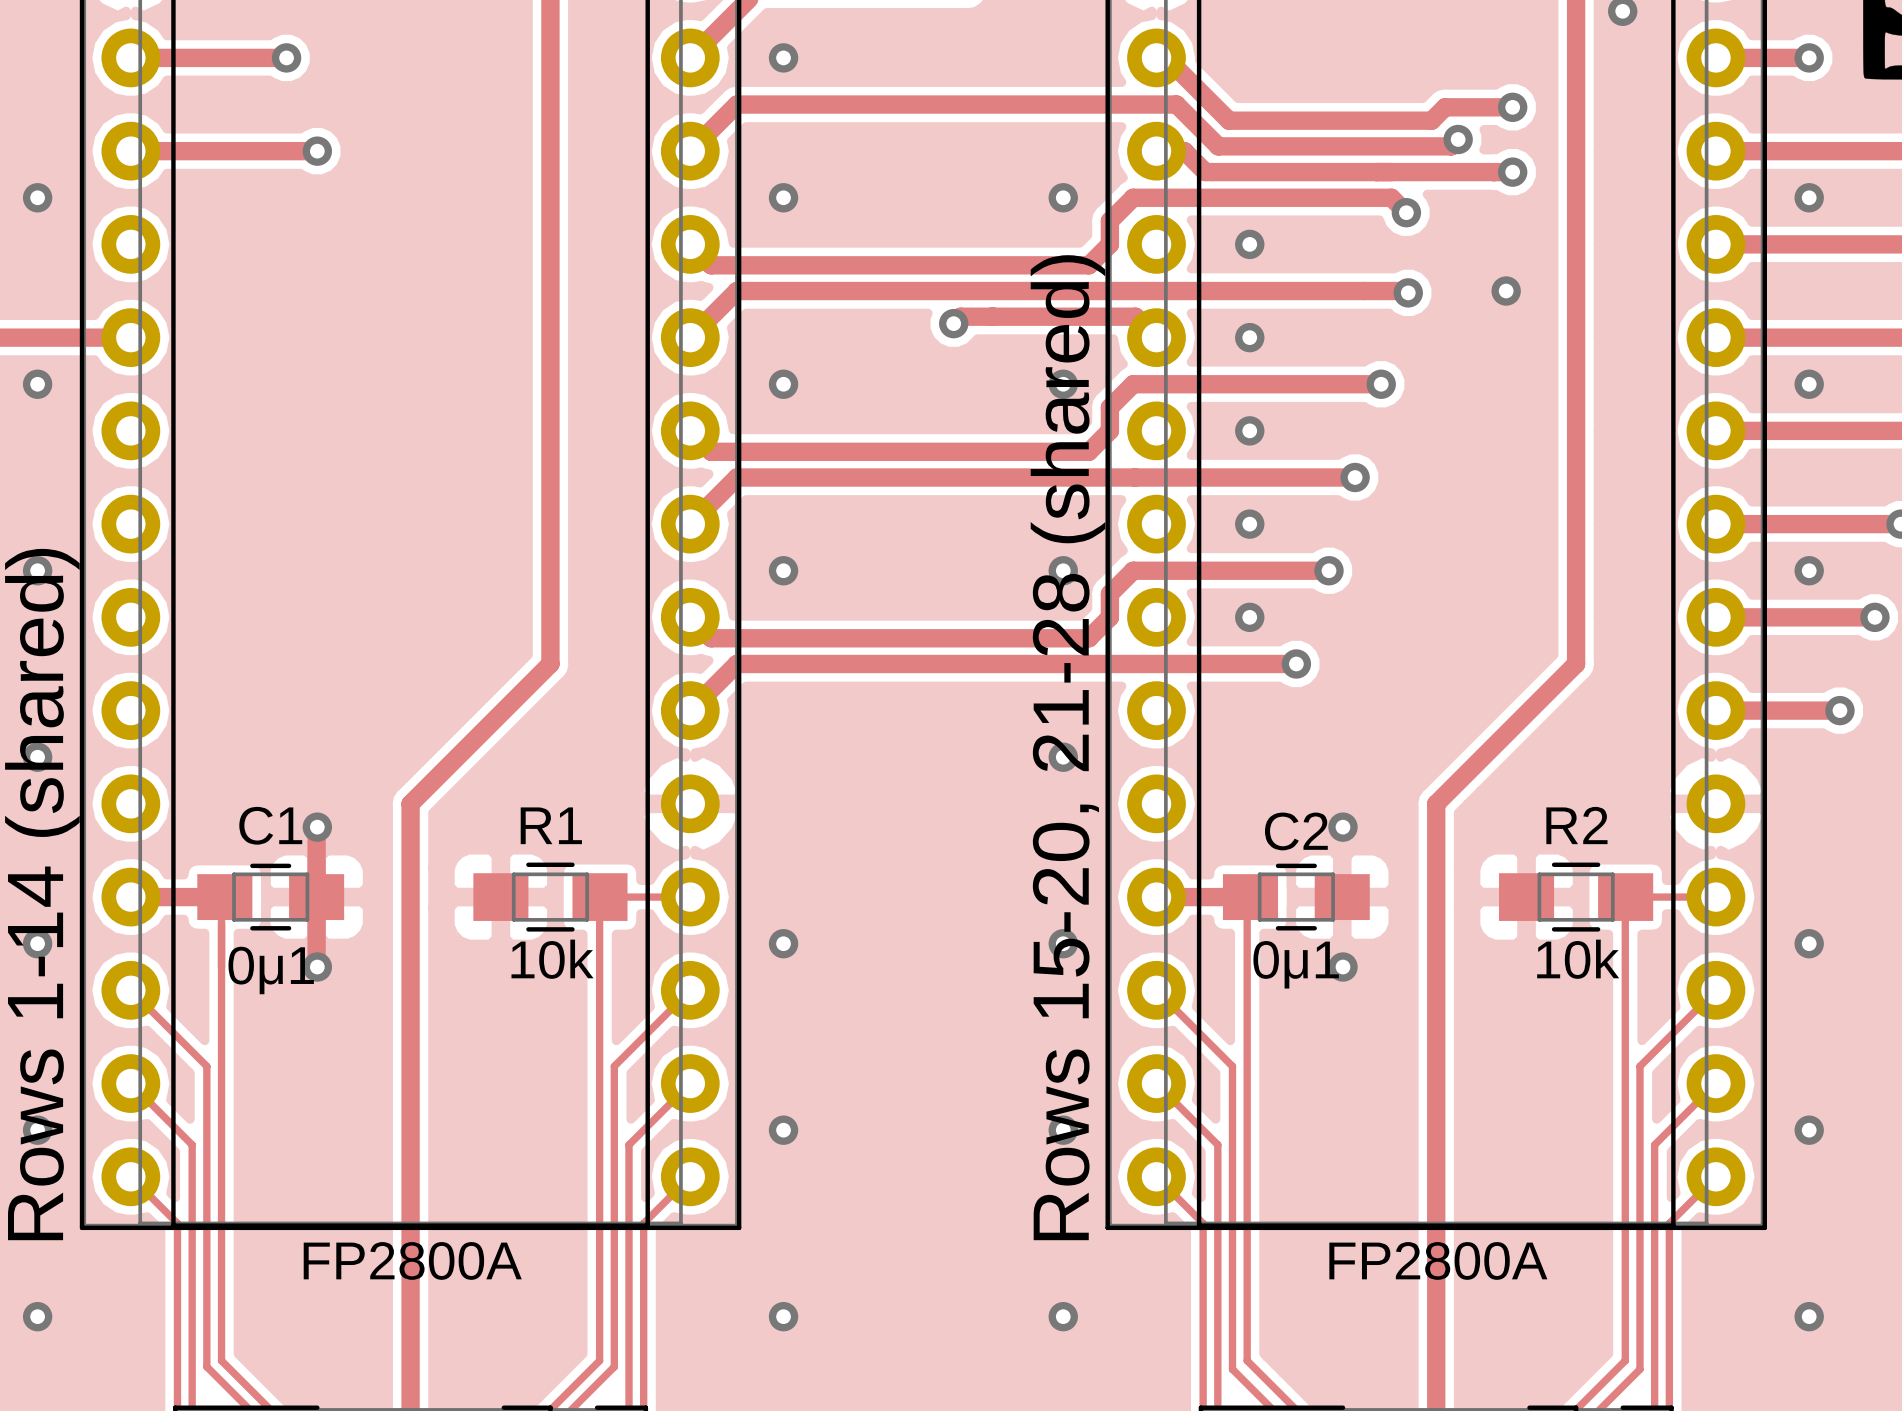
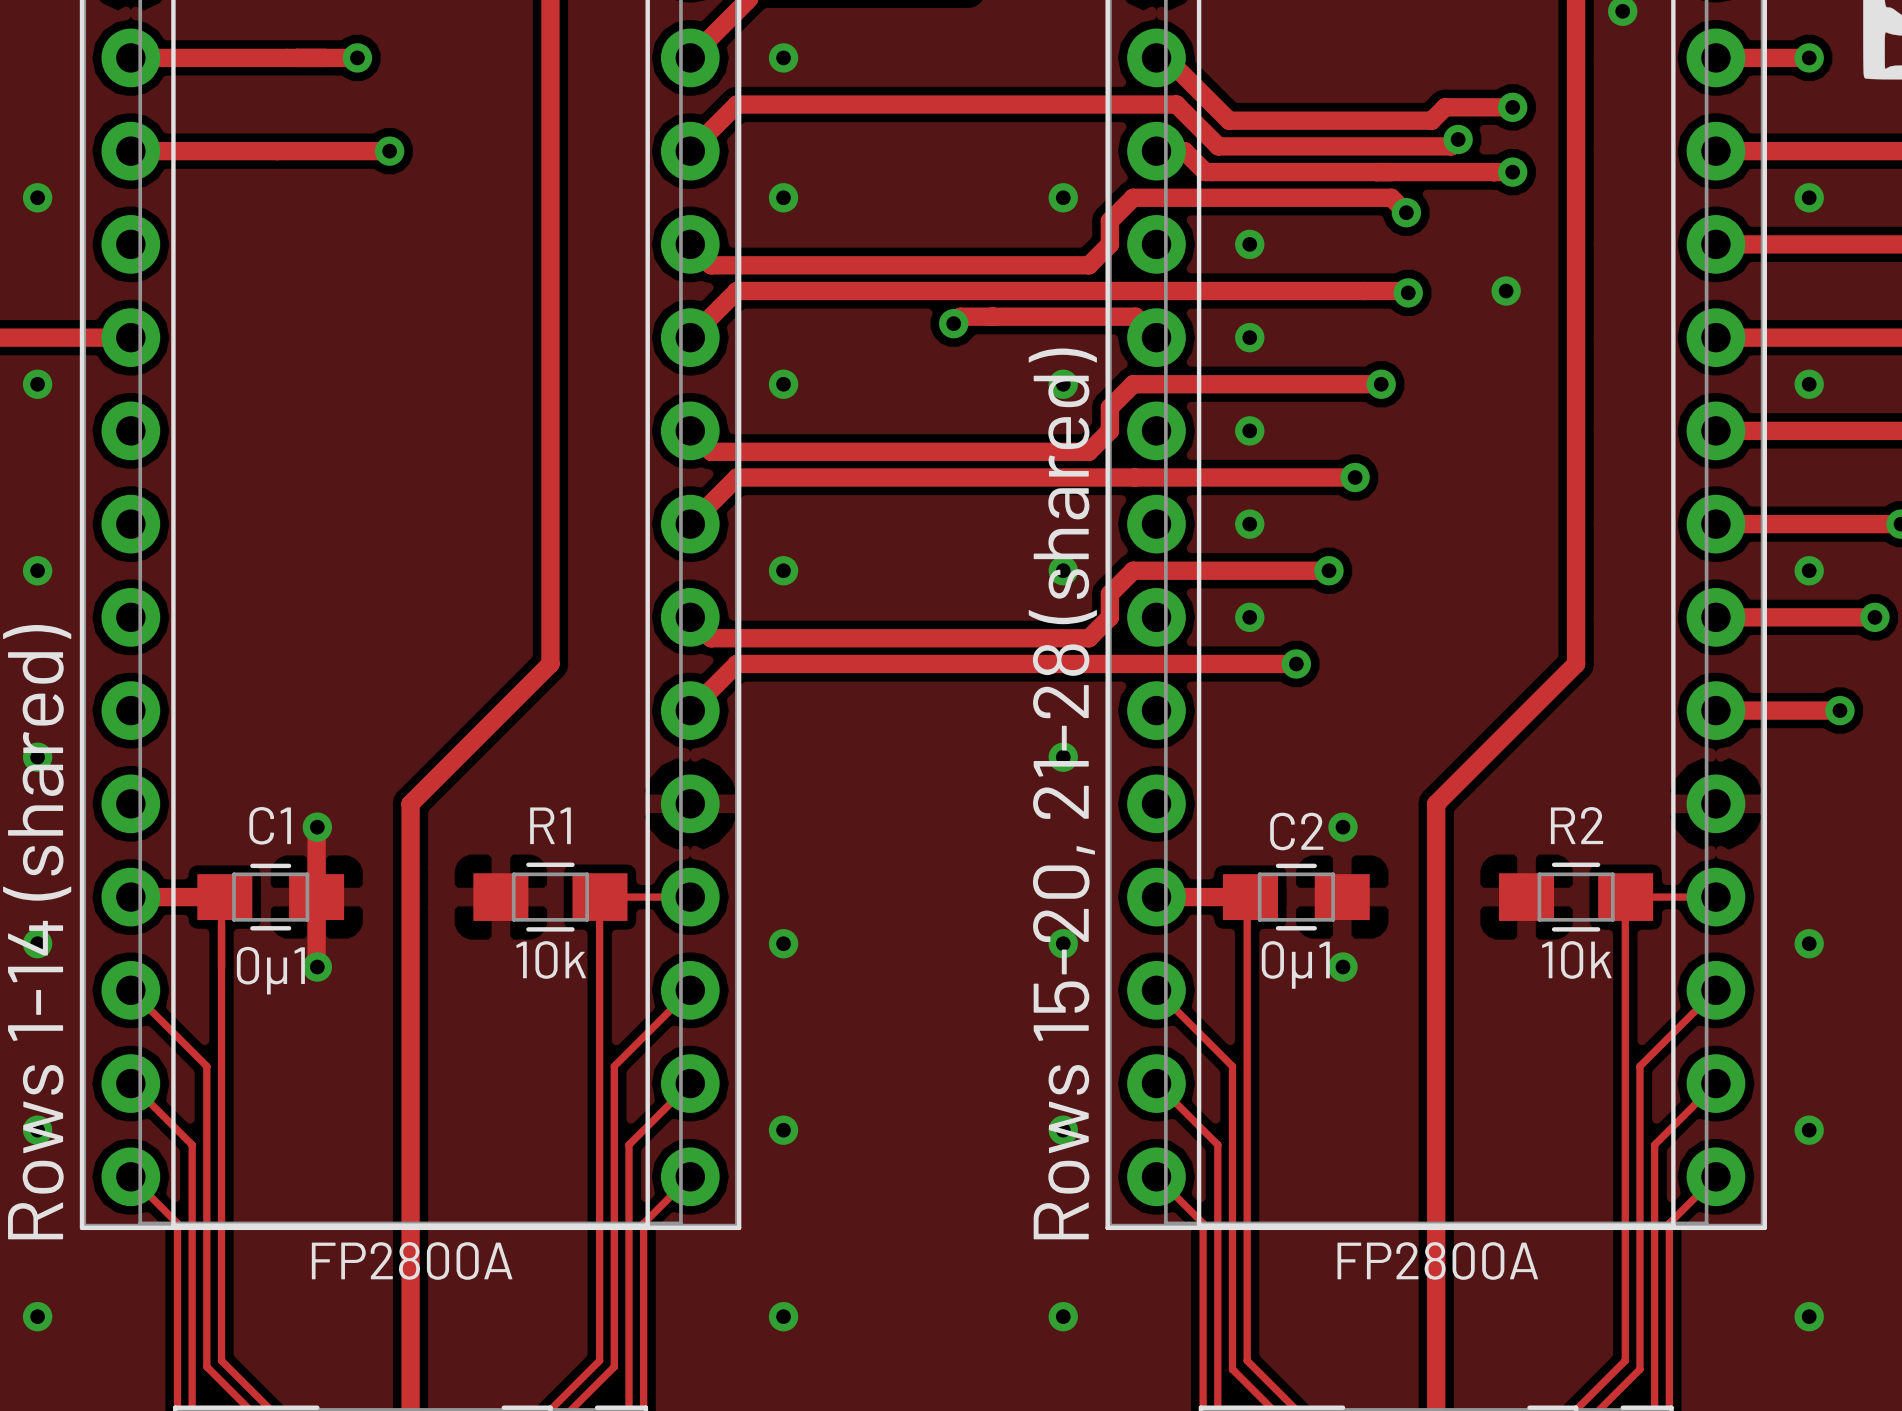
track: none -> (286, 57) (357, 57)
via: (286, 57) -> none
via: none -> (357, 57)
track: none -> (317, 151) (390, 151)
via: (317, 151) -> none
via: none -> (389, 151)

